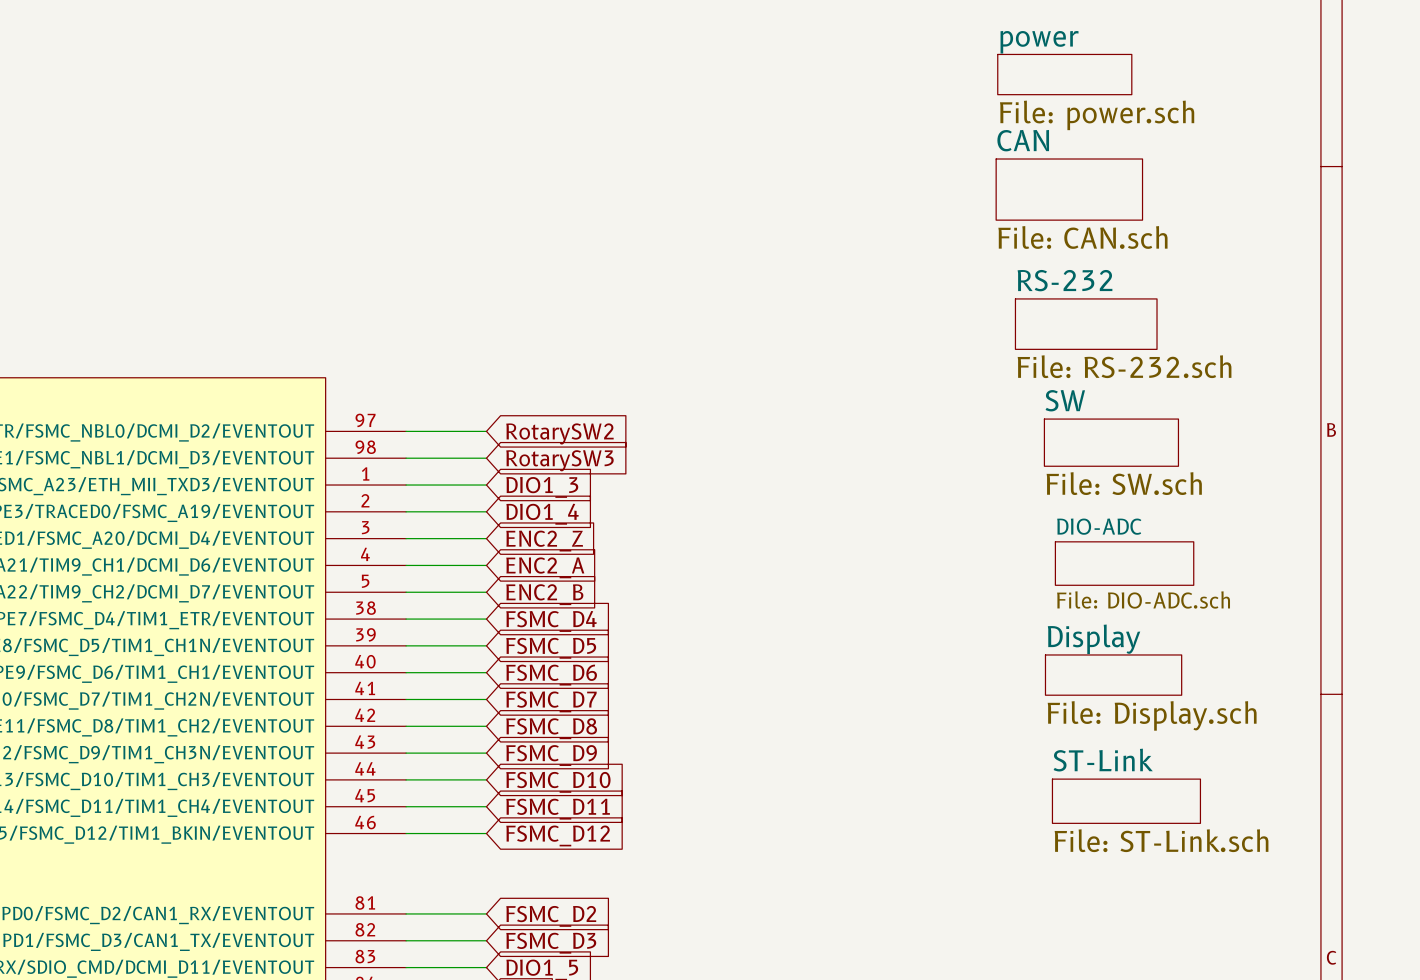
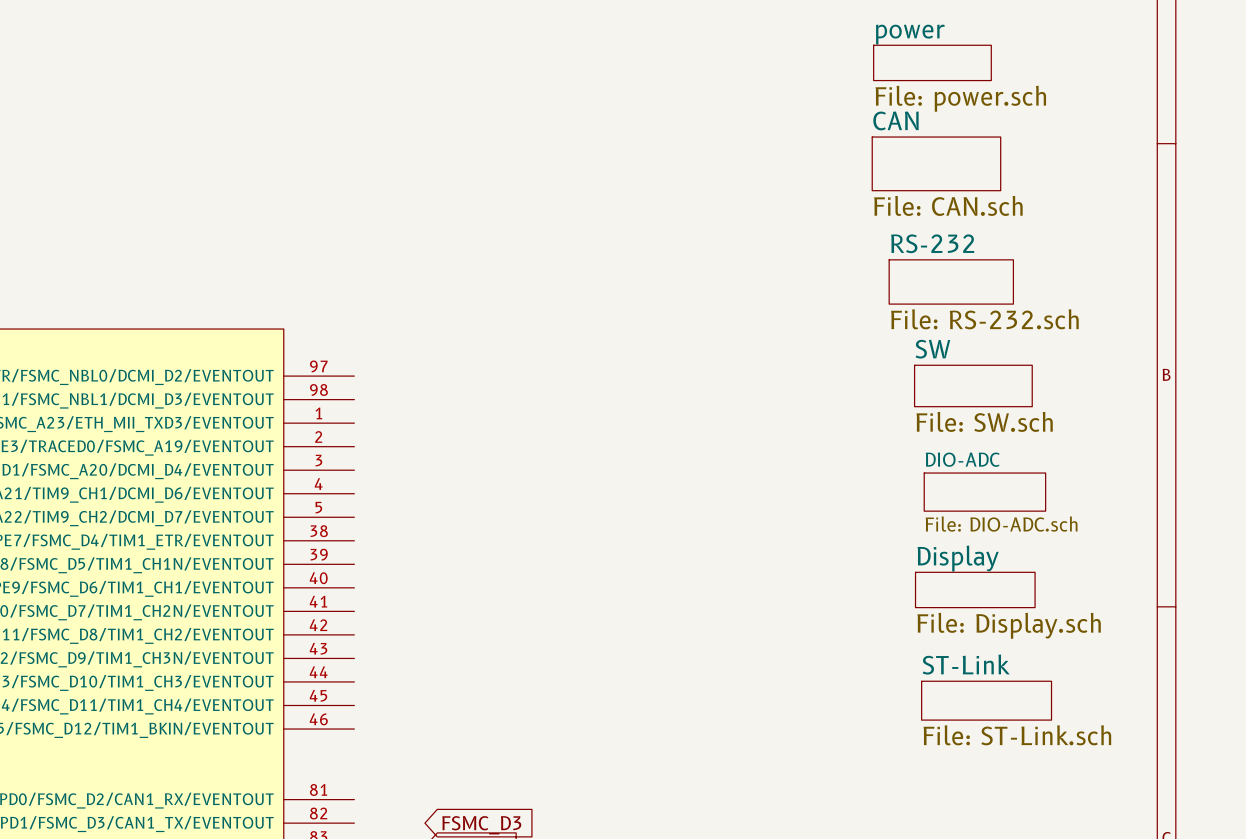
wire: (406, 431) (486, 431) -> none
global label: RotarySW2 (559, 433) -> none
wire: (406, 458) (486, 458) -> none
global label: RotarySW3 (559, 460) -> none
wire: (406, 485) (486, 485) -> none
global label: DIO1_3 (542, 487) -> none
wire: (406, 511) (486, 511) -> none
global label: DIO1_4 (542, 514) -> none
wire: (406, 538) (486, 538) -> none
global label: ENC2_Z (544, 541) -> none
wire: (406, 565) (486, 565) -> none
global label: ENC2_A (545, 567) -> none
wire: (406, 592) (486, 592) -> none
global label: ENC2_B (544, 594) -> none
wire: (406, 619) (486, 619) -> none
global label: FSMC_D4 (551, 621) -> none
wire: (406, 645) (486, 645) -> none
global label: FSMC_D5 (551, 648) -> none
wire: (406, 672) (486, 672) -> none
global label: FSMC_D6 (551, 675) -> none
wire: (406, 699) (486, 699) -> none
global label: FSMC_D7 (551, 701) -> none
wire: (406, 726) (486, 726) -> none
global label: FSMC_D8 (551, 728) -> none
wire: (406, 753) (486, 753) -> none
global label: FSMC_D9 (551, 755) -> none
wire: (406, 779) (486, 779) -> none
global label: FSMC_D10 (558, 782) -> none
wire: (406, 806) (486, 806) -> none
global label: FSMC_D11 (558, 809) -> none
wire: (406, 833) (486, 833) -> none
global label: FSMC_D12 (558, 835) -> none
wire: (406, 913) (486, 913) -> none
global label: FSMC_D2 (551, 916) -> none
wire: (406, 940) (486, 940) -> none

